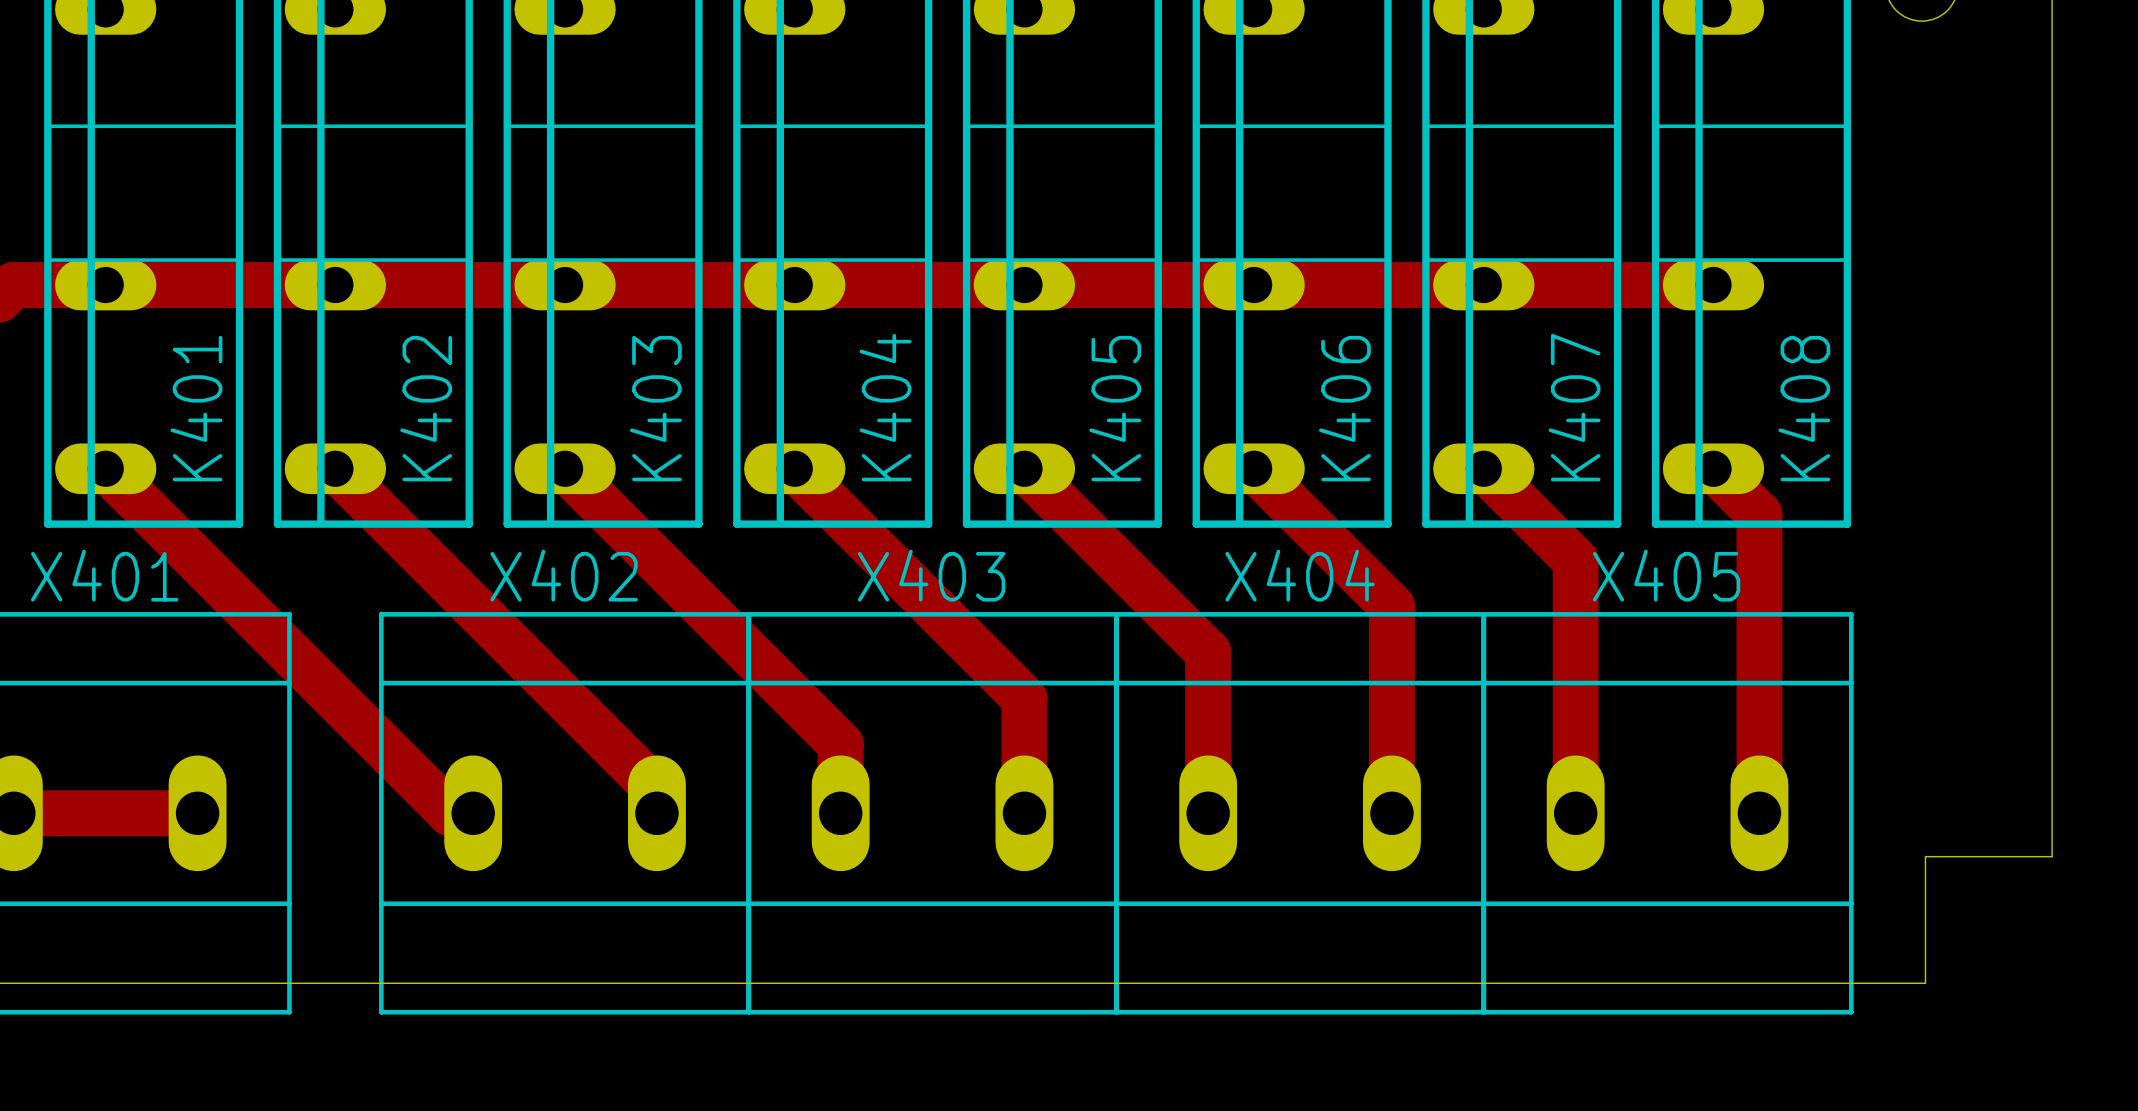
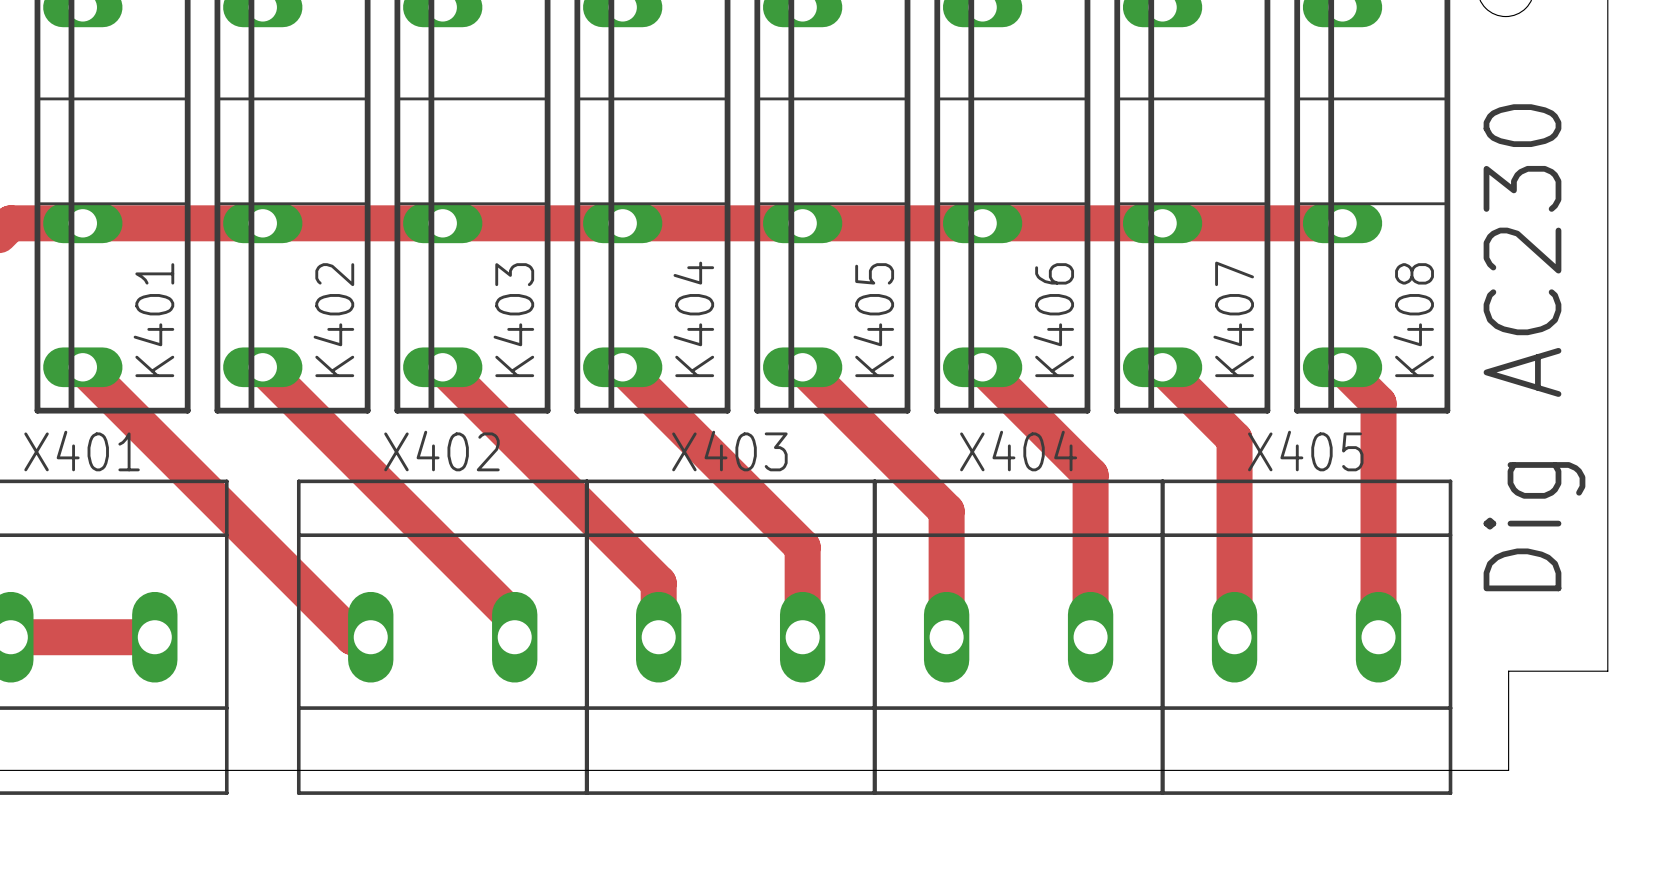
text: none -> Dig AC230 (1534, 347)

